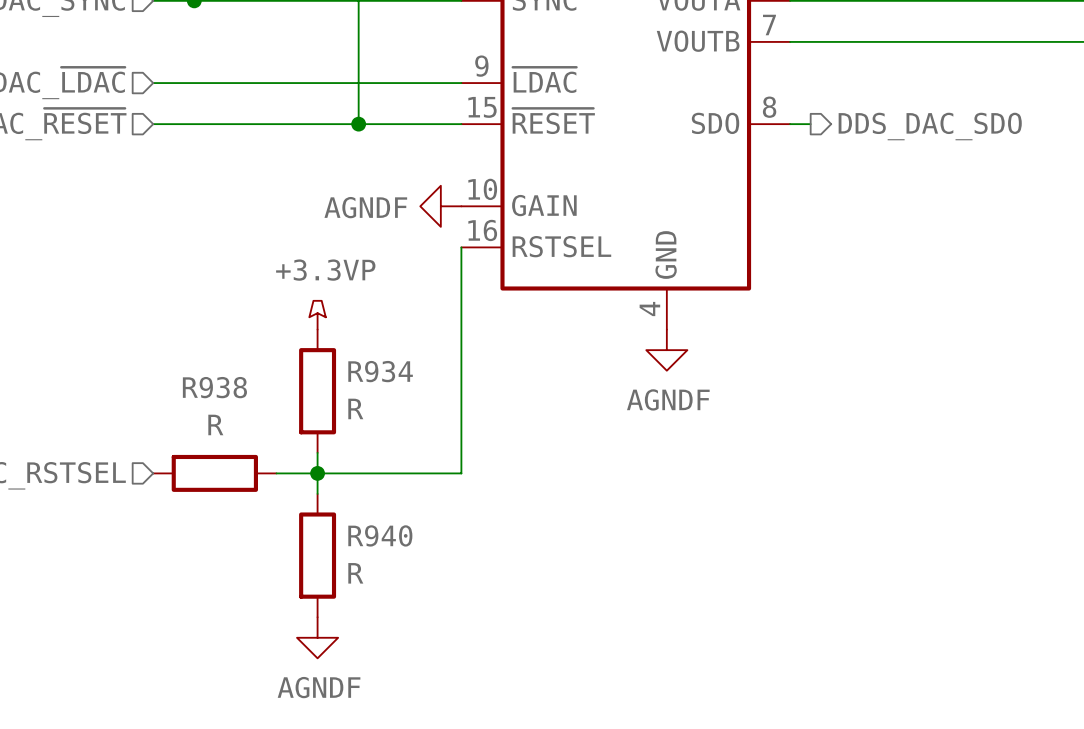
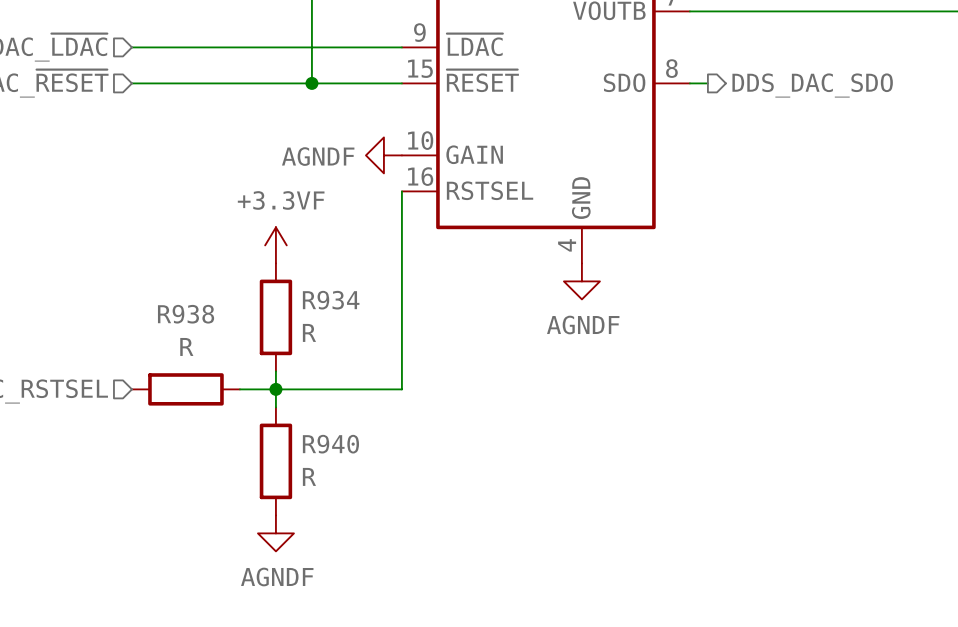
power symbol: +3.3VP (317, 315) -> +3.3VF (275, 245)

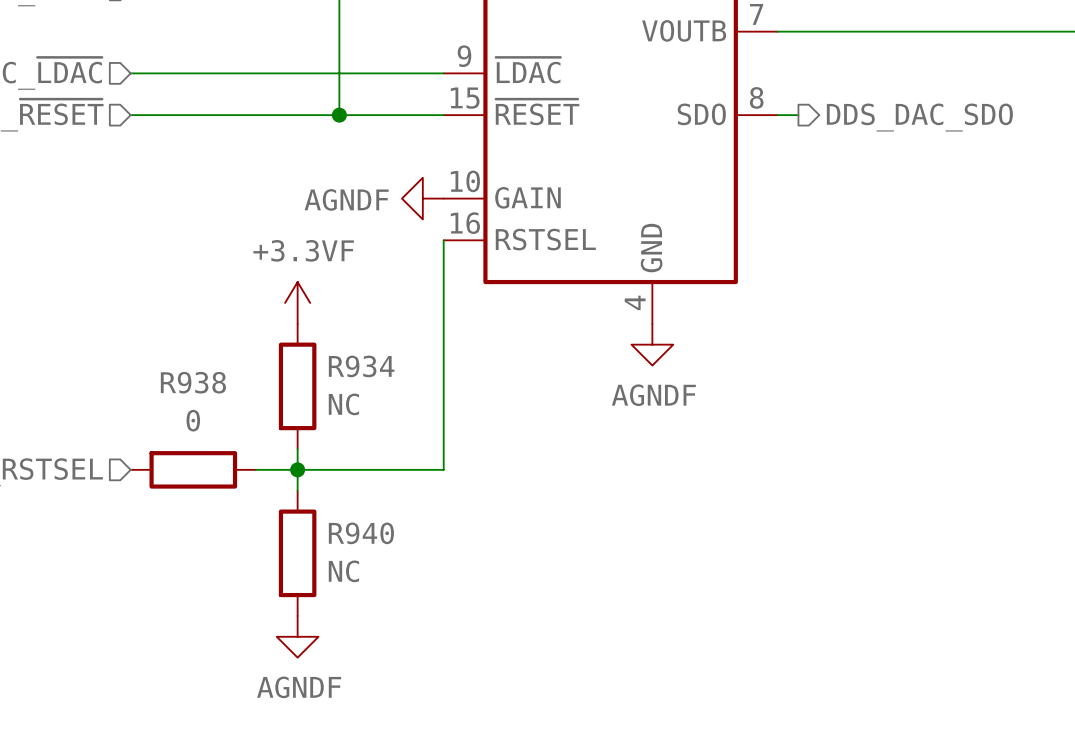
R934 value: R (309, 332) -> NC (343, 404)
R938 value: R (186, 346) -> 0 (193, 420)
R940 value: R (309, 476) -> NC (343, 571)

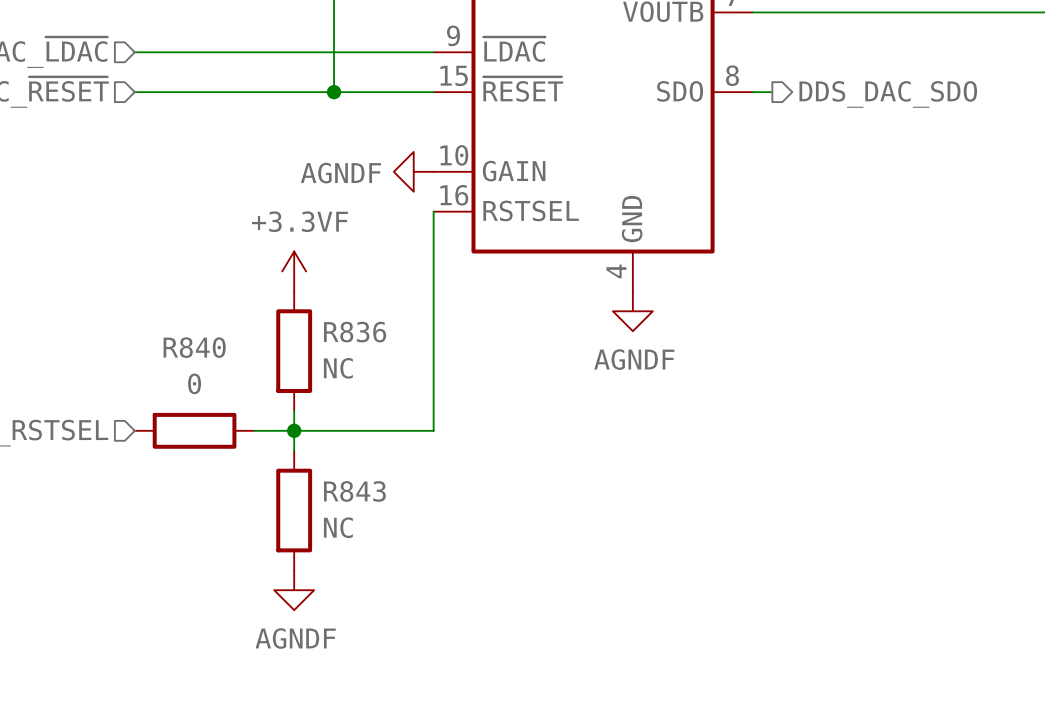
R934 name: R934 (361, 366) -> R836 (355, 332)
R938 name: R938 (193, 382) -> R840 (194, 347)
R940 name: R940 (361, 533) -> R843 (354, 491)

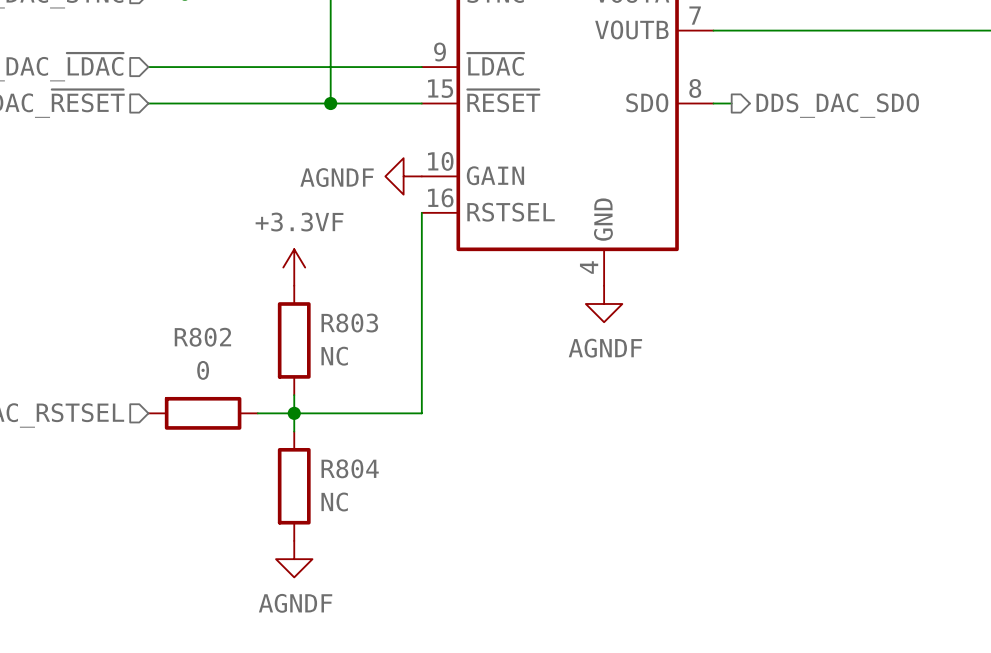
R836 name: R836 (355, 332) -> R803 (349, 323)
R840 name: R840 (194, 347) -> R802 (202, 337)
R843 name: R843 (354, 491) -> R804 (350, 468)

